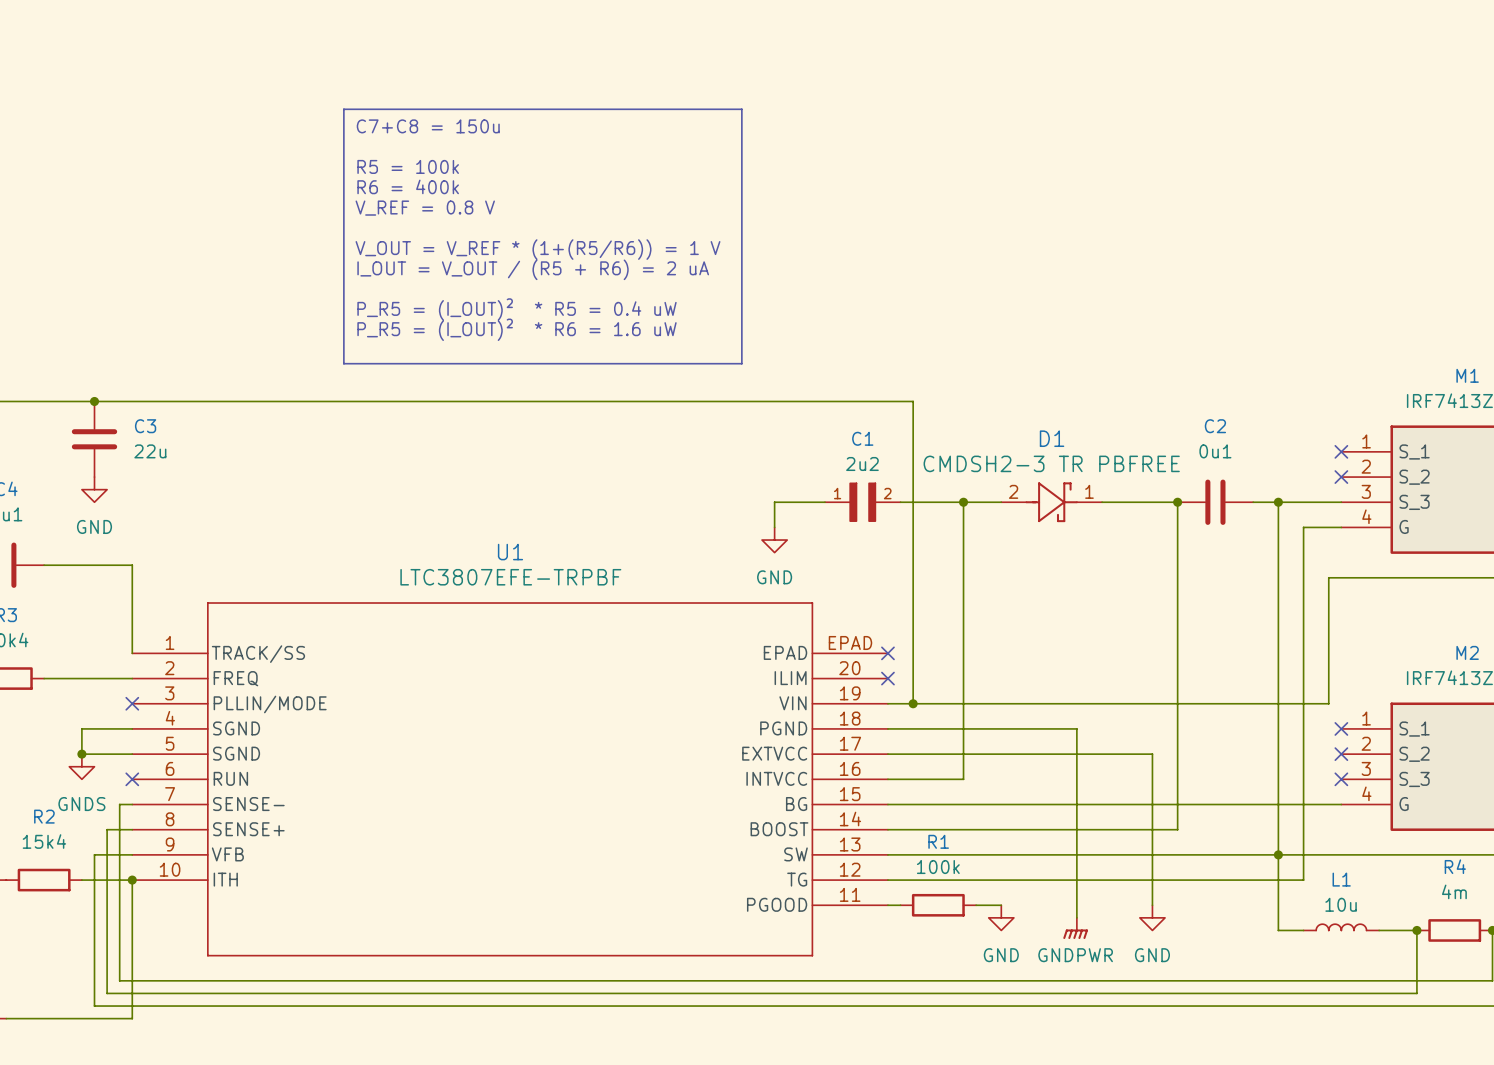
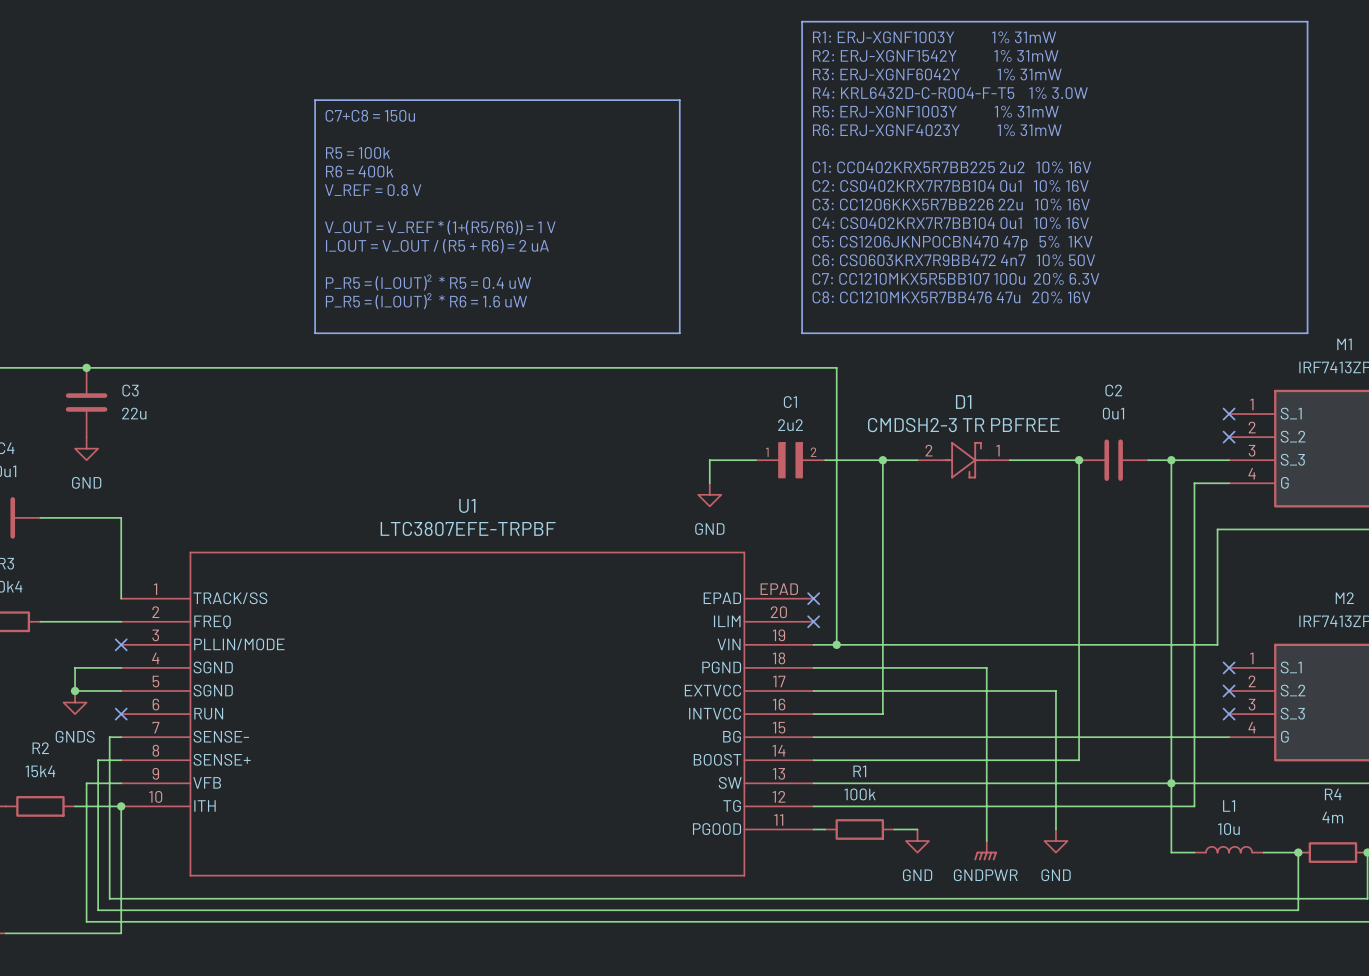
line: none -> (802, 21) (1307, 21) (1307, 333) (802, 333) (802, 21)
text: none -> R1: ERJ-XGNF1003Y 1% 31mW (934, 37)
text: none -> R2: ERJ-XGNF1542Y 1% 31mW (935, 55)
text: none -> R3: ERJ-XGNF6042Y 1% 31mW (937, 74)
text: none -> R4: KRL6432D-C-R004-F-T5 1% 3.0W (950, 93)
text: none -> R5: ERJ-XGNF1003Y 1% 31mW (935, 111)
text: none -> R6: ERJ-XGNF4023Y 1% 31mW (937, 130)
text: none -> C1: CC0402KRX5R7BB225 2u2 10% 16V (951, 167)
text: none -> C2: CS0402KRX7R7BB104 0u1 10% 16V (950, 185)
text: none -> C3: CC1206KKX5R7BB226 22u 10% 16V (951, 204)
text: none -> C4: CS0402KRX7R7BB104 0u1 10% 16V (950, 223)
text: none -> C5: CS1206JKNPOCBN470 47p 5% 1KV (952, 243)
text: none -> C6: CS0603KRX7R9BB472 4n7 10% 50V (953, 260)
text: none -> C7: CC1210MKX5R5BB107 100u 20% 6.3V (955, 278)
text: none -> C8: CC1210MKX5R7BB476 47u 20% 16V (951, 297)

